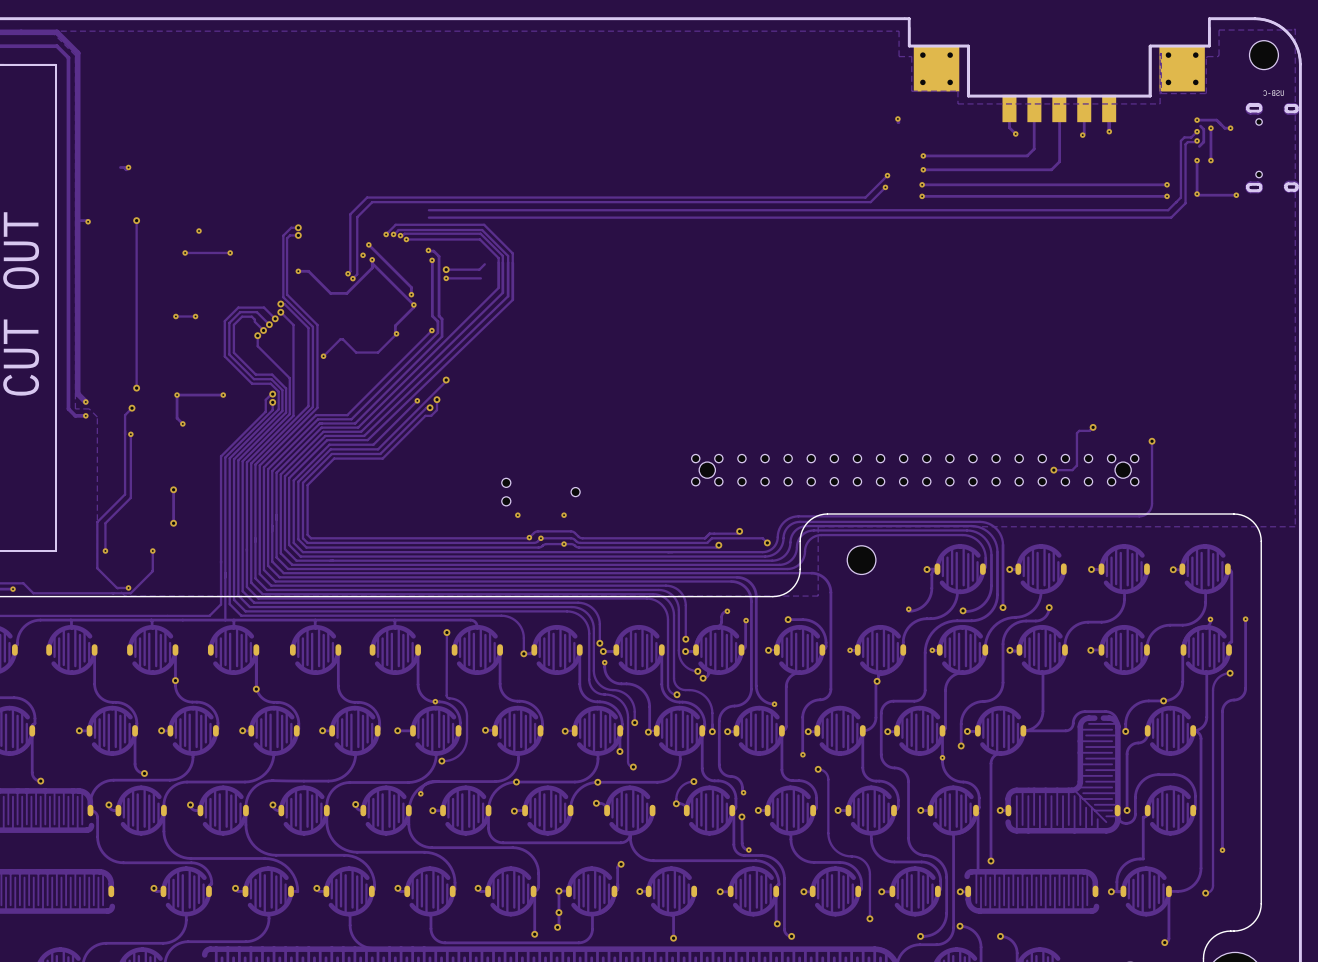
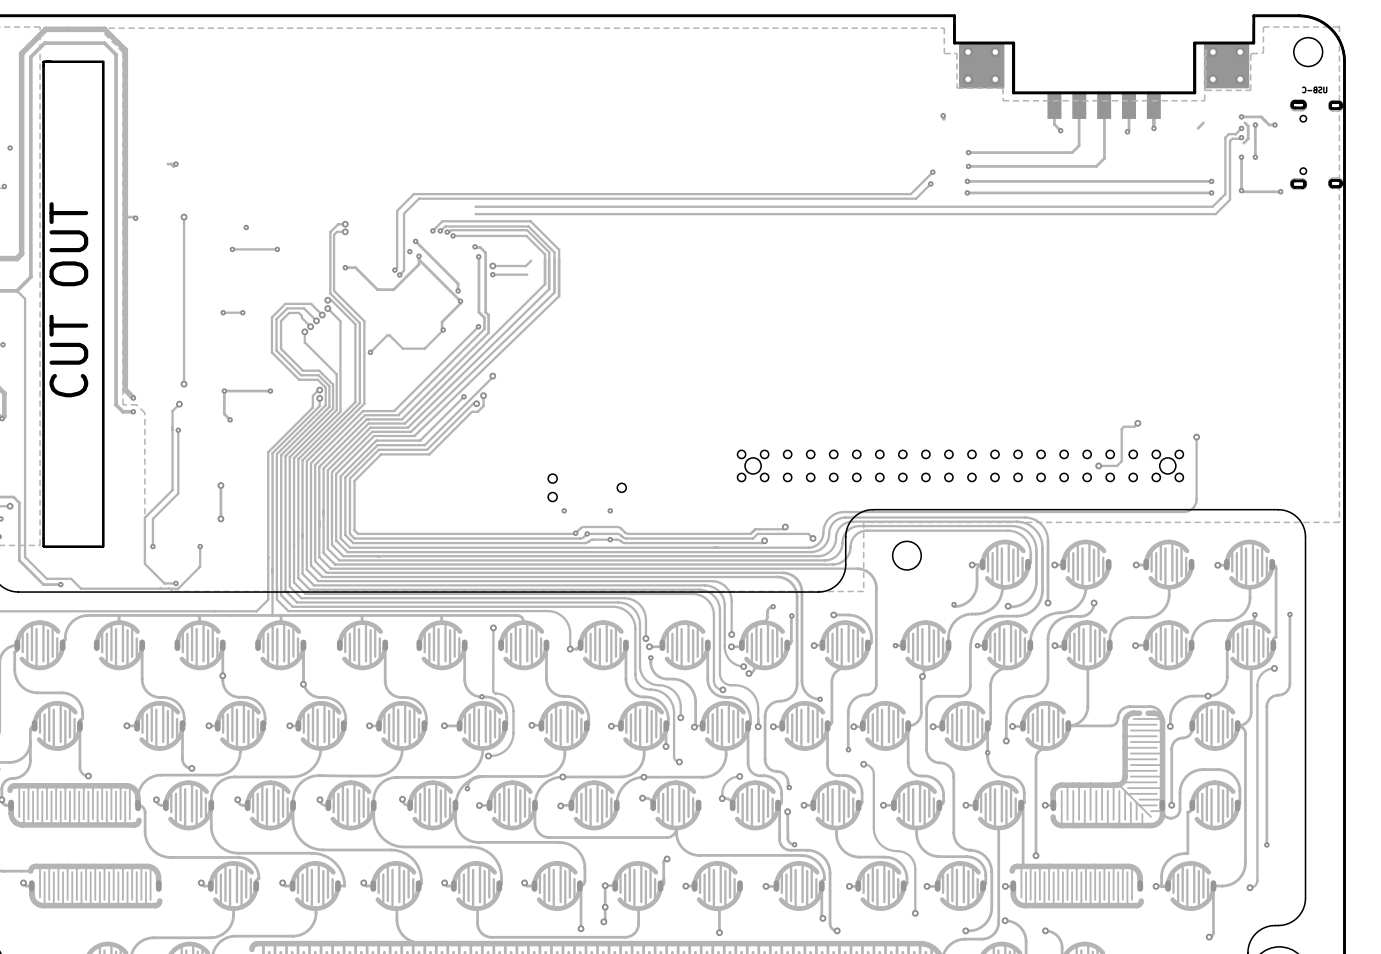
track: none -> (1203, 122) (1197, 128)

